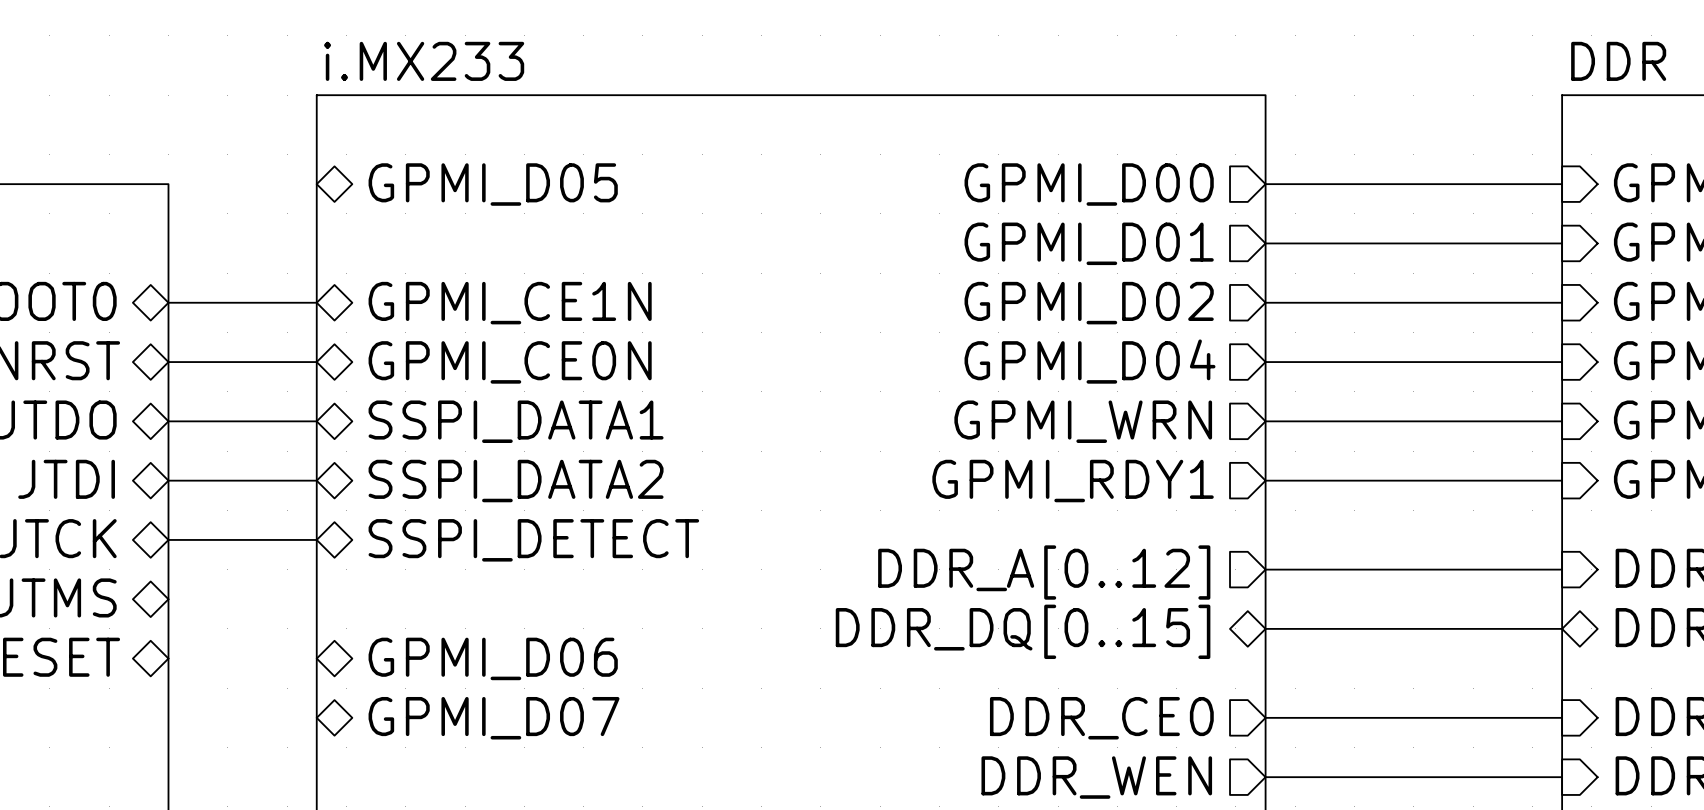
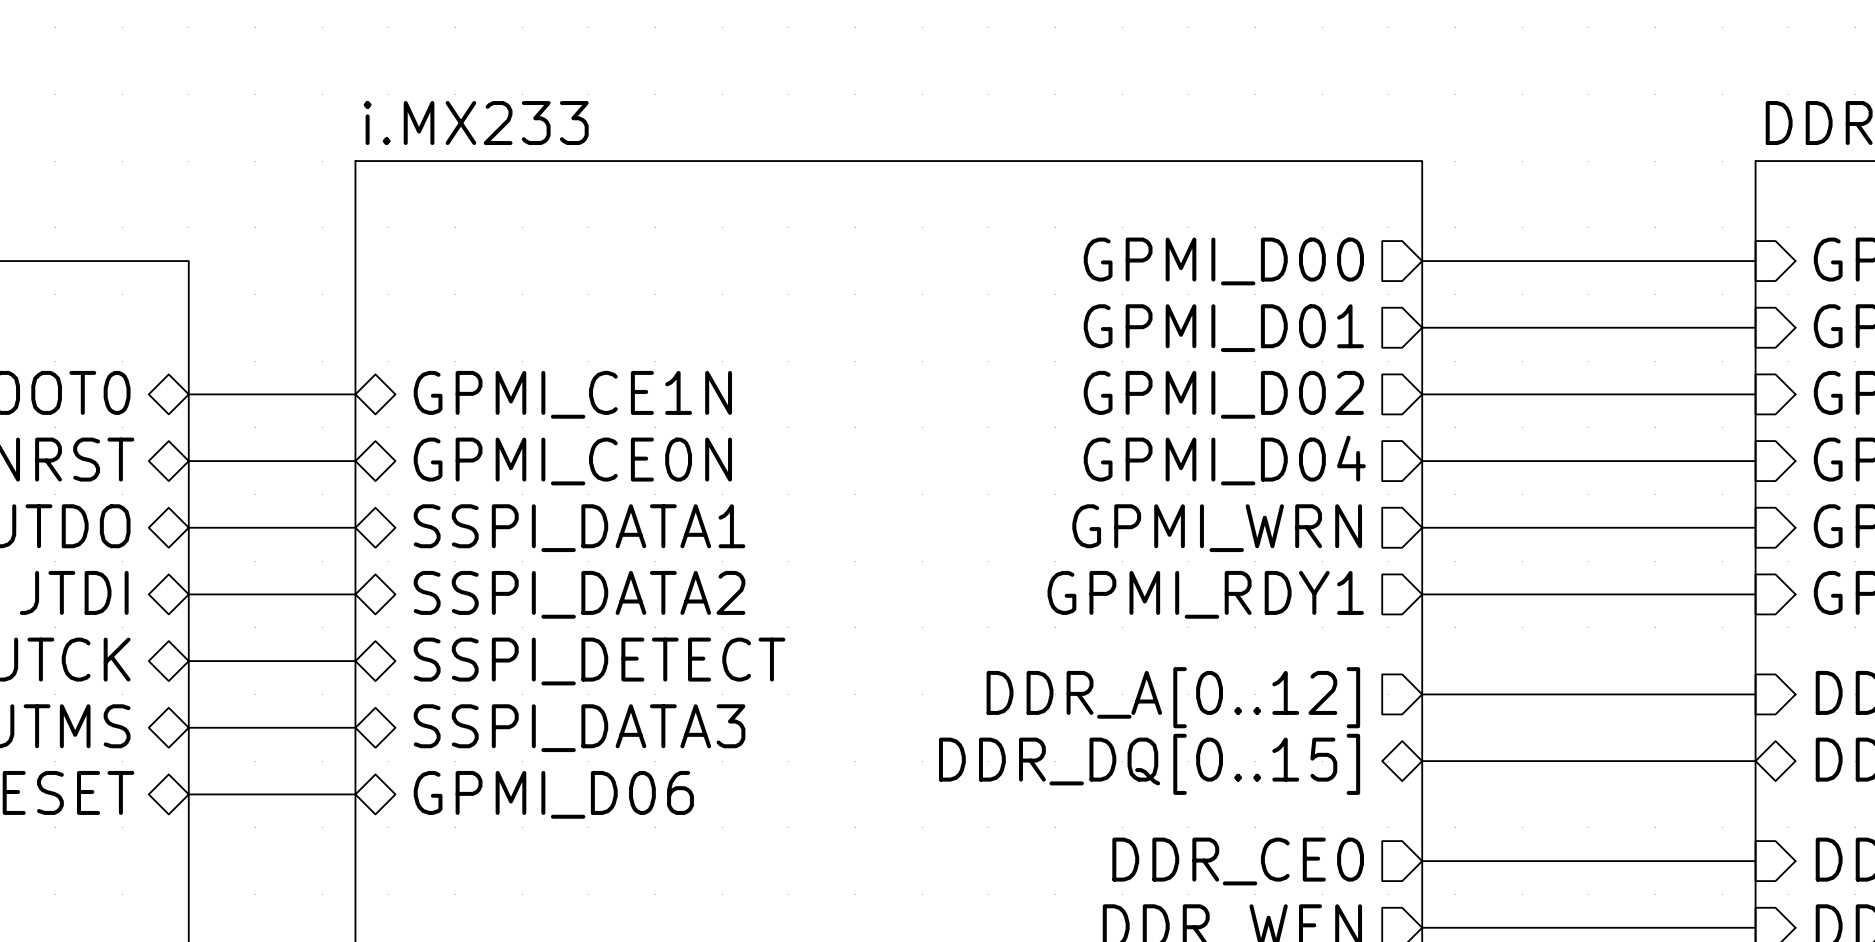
sheet pin: GPMI_D05 (493, 184) -> none
wire: none -> (188, 727) (355, 727)
sheet pin: none -> SSPI_DATA3 (579, 728)
wire: none -> (188, 794) (355, 794)
sheet pin: GPMI_D07 (494, 718) -> none

